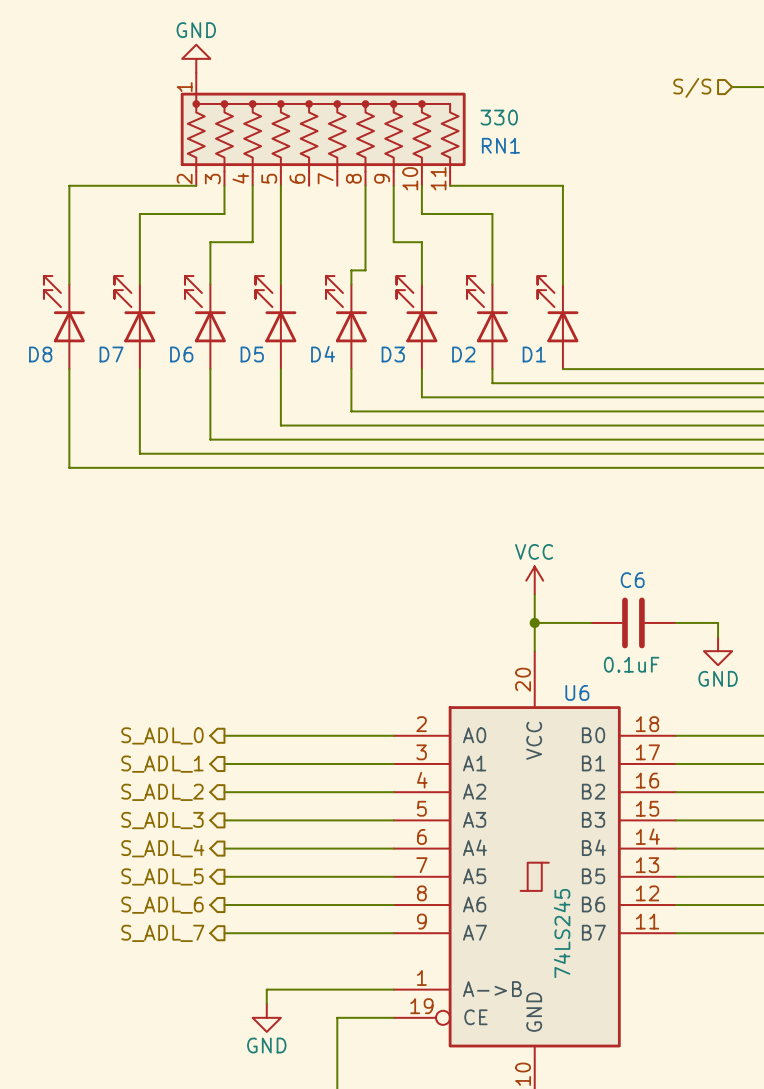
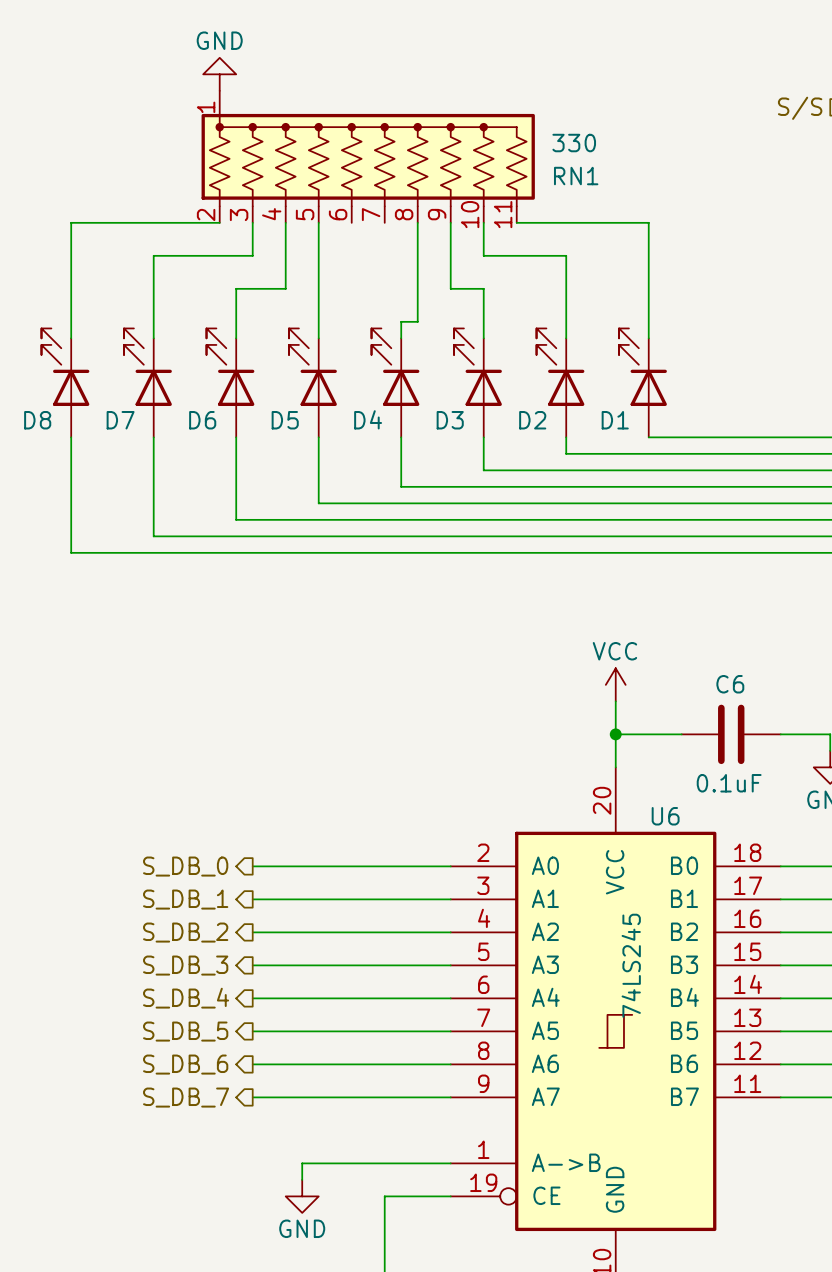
hierarchical label: S_ADL_0 (162, 735) -> S_DB_0 (185, 866)
hierarchical label: S_ADL_1 (162, 764) -> S_DB_1 (185, 899)
hierarchical label: S_ADL_2 (162, 792) -> S_DB_2 (185, 932)
hierarchical label: S_ADL_3 (162, 820) -> S_DB_3 (185, 965)
hierarchical label: S_ADL_4 (162, 848) -> S_DB_4 (186, 998)
hierarchical label: S_ADL_5 (162, 876) -> S_DB_5 (185, 1031)
hierarchical label: S_ADL_6 (162, 905) -> S_DB_6 (185, 1064)
hierarchical label: S_ADL_7 (162, 933) -> S_DB_7 (186, 1097)
U6 value position: 74LS245 (562, 933) -> 74LS245 (631, 965)

